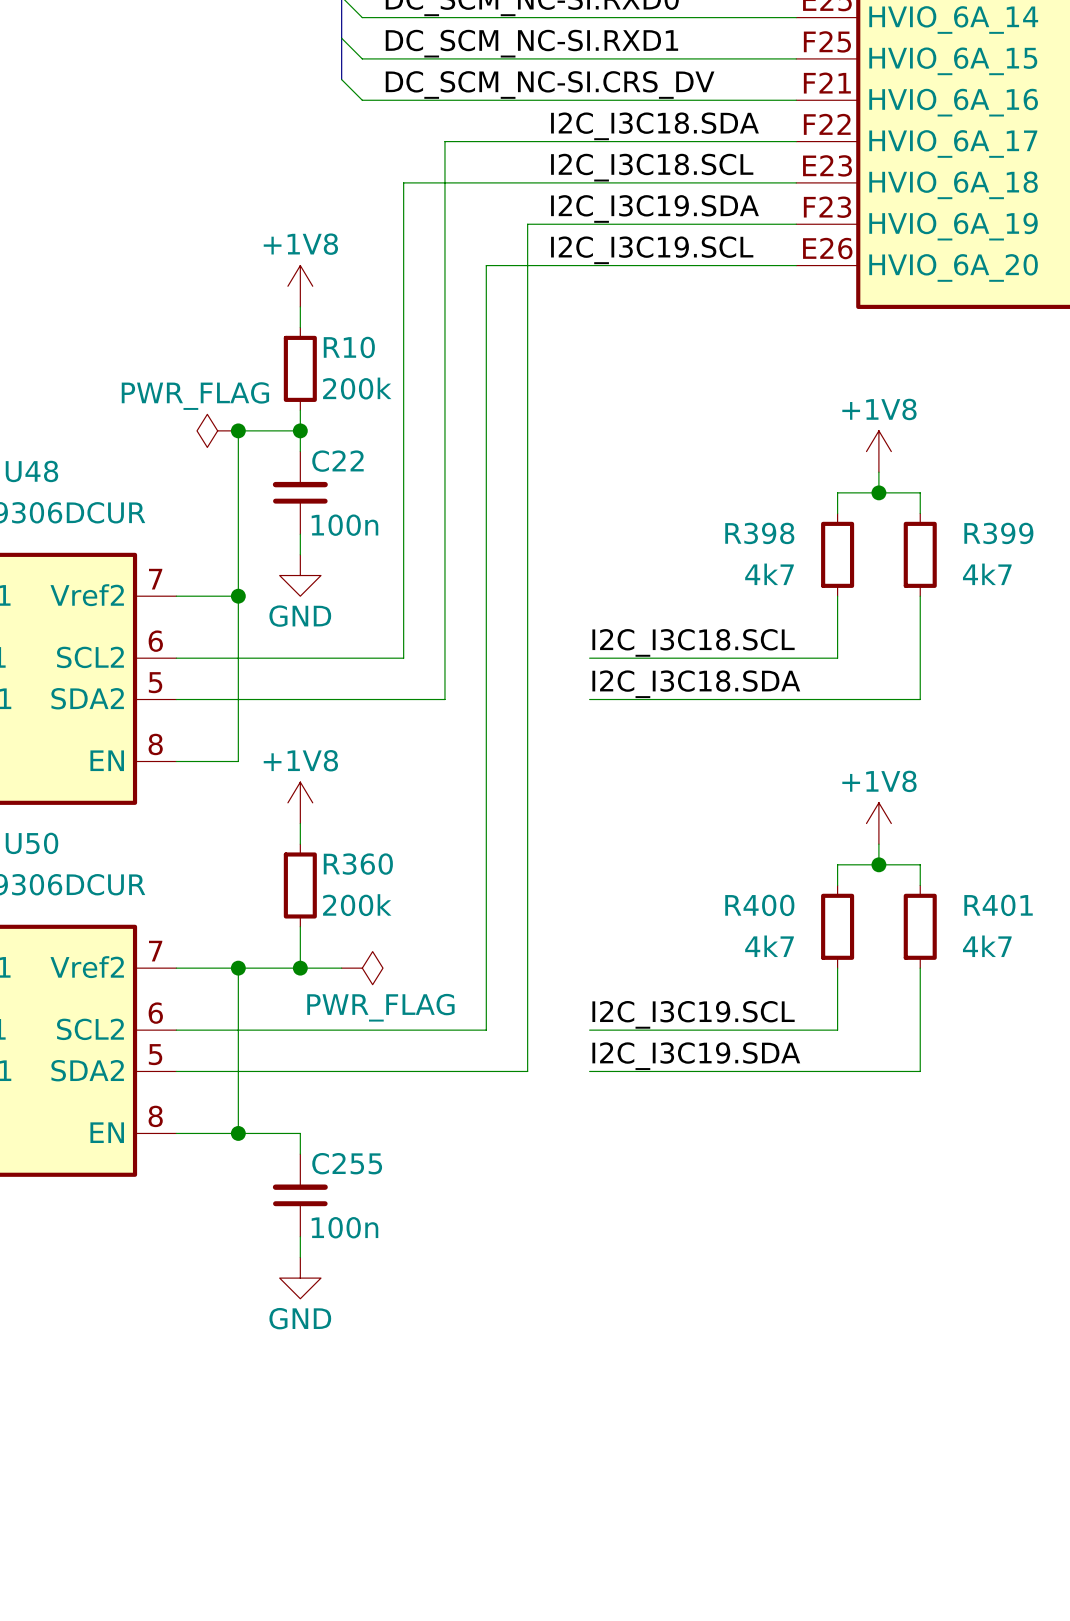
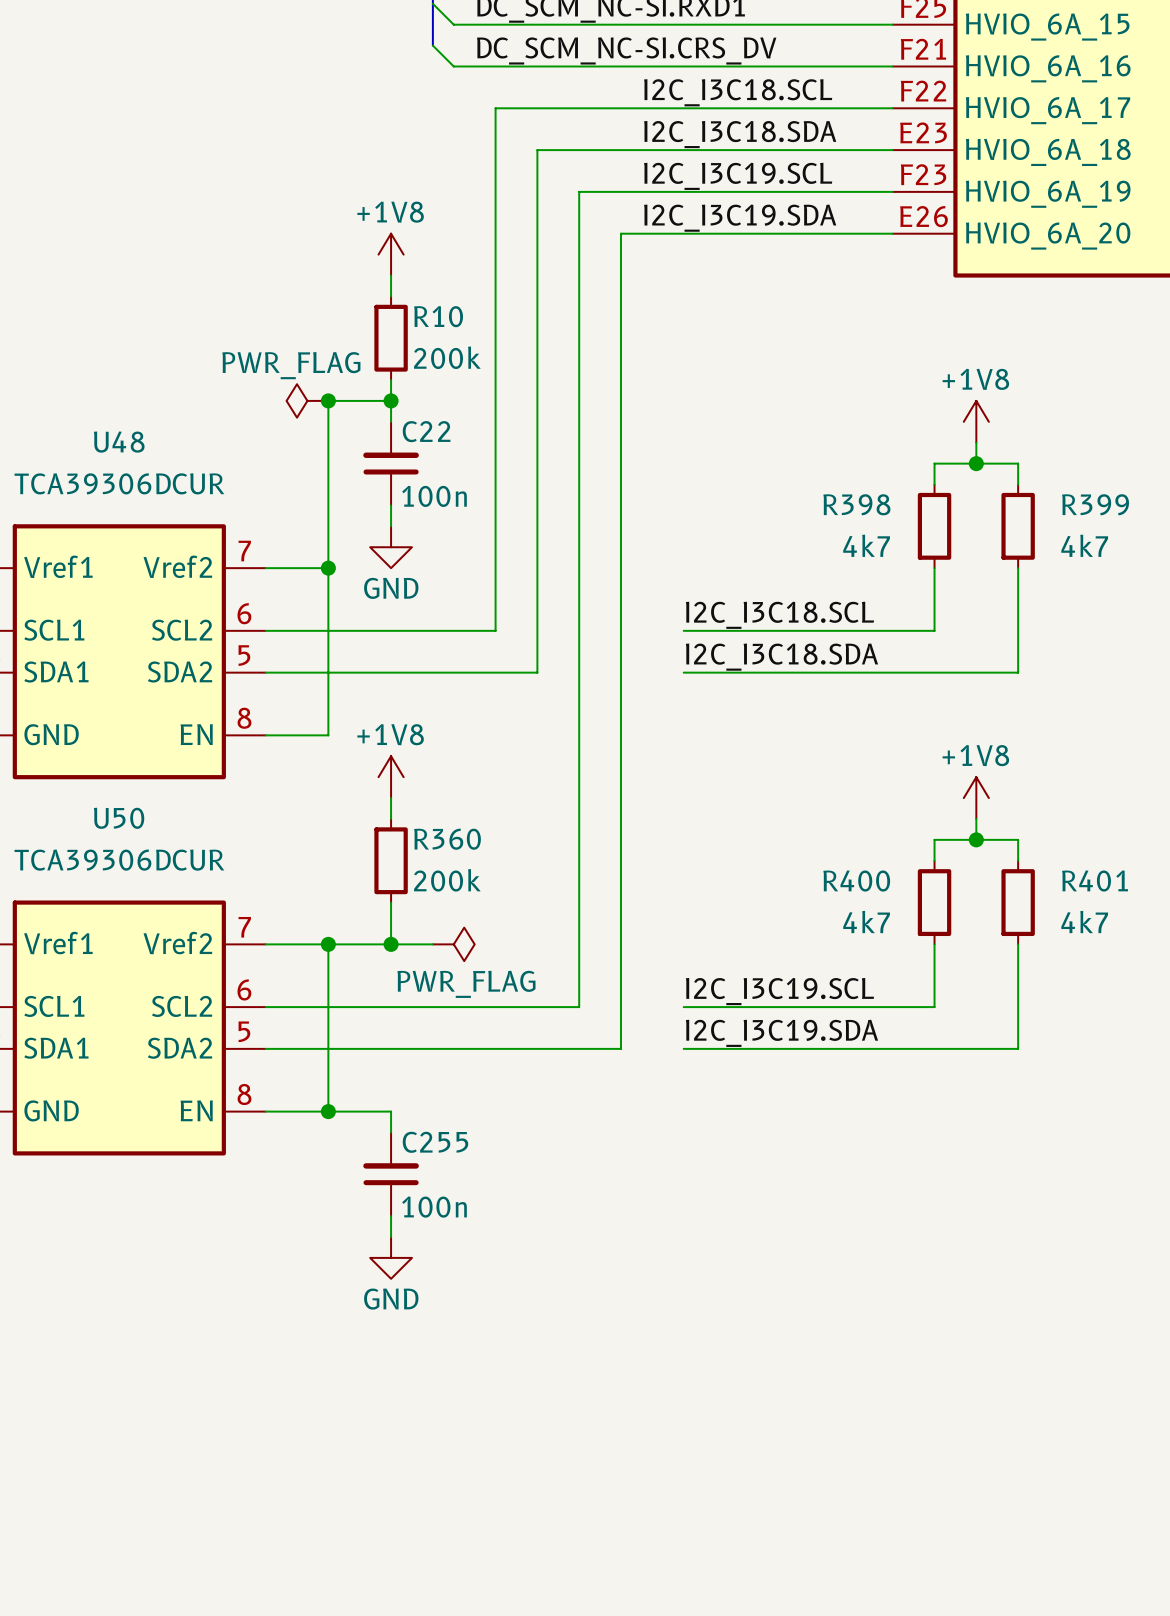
label: I2C_I3C18.SDA (654, 126) -> I2C_I3C18.SCL (738, 92)
wire: (444, 141) (444, 182) (403, 182) -> (537, 108) (495, 108) (495, 150)
label: I2C_I3C18.SCL (652, 167) -> I2C_I3C18.SDA (740, 134)
label: I2C_I3C19.SDA (654, 208) -> I2C_I3C19.SCL (738, 176)
wire: (527, 224) (527, 265) (486, 265) -> (620, 191) (579, 191) (579, 233)
label: I2C_I3C19.SCL (652, 250) -> I2C_I3C19.SDA (740, 218)

